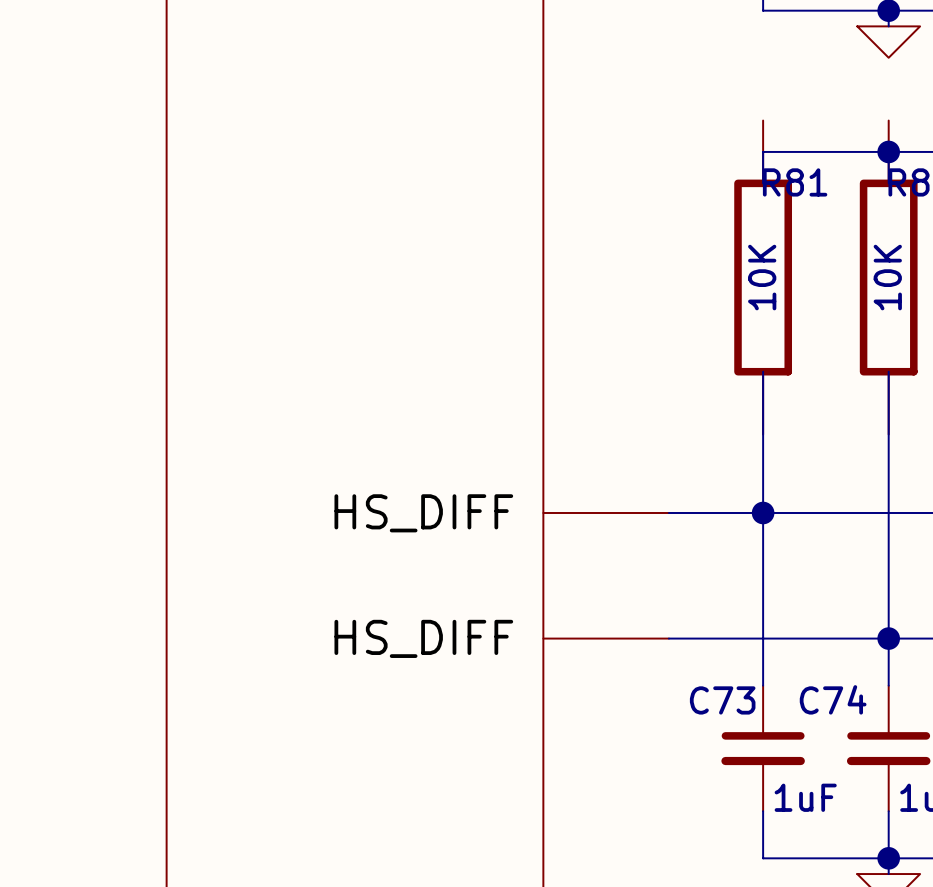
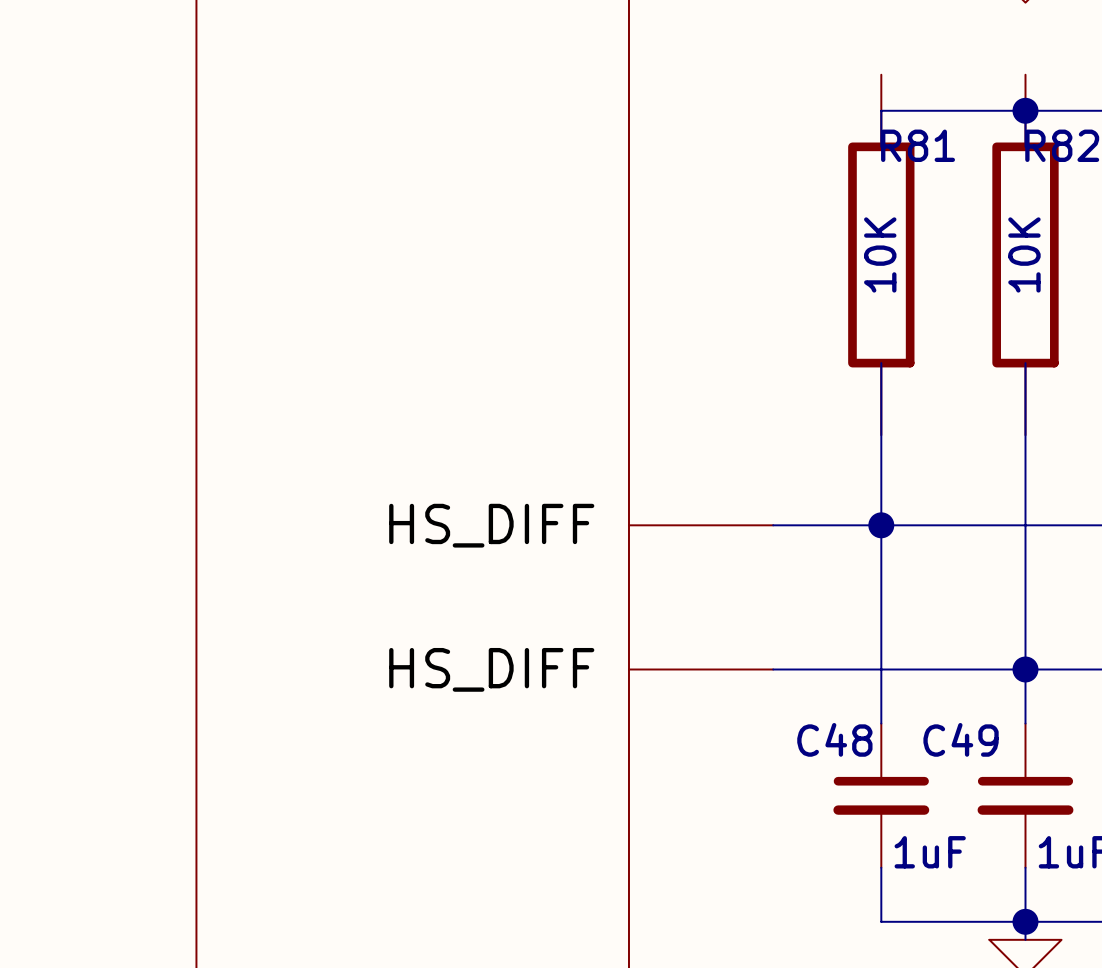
C74 name: C74 (833, 699) -> C49 (961, 739)
C73 name: C73 (722, 700) -> C48 (834, 739)

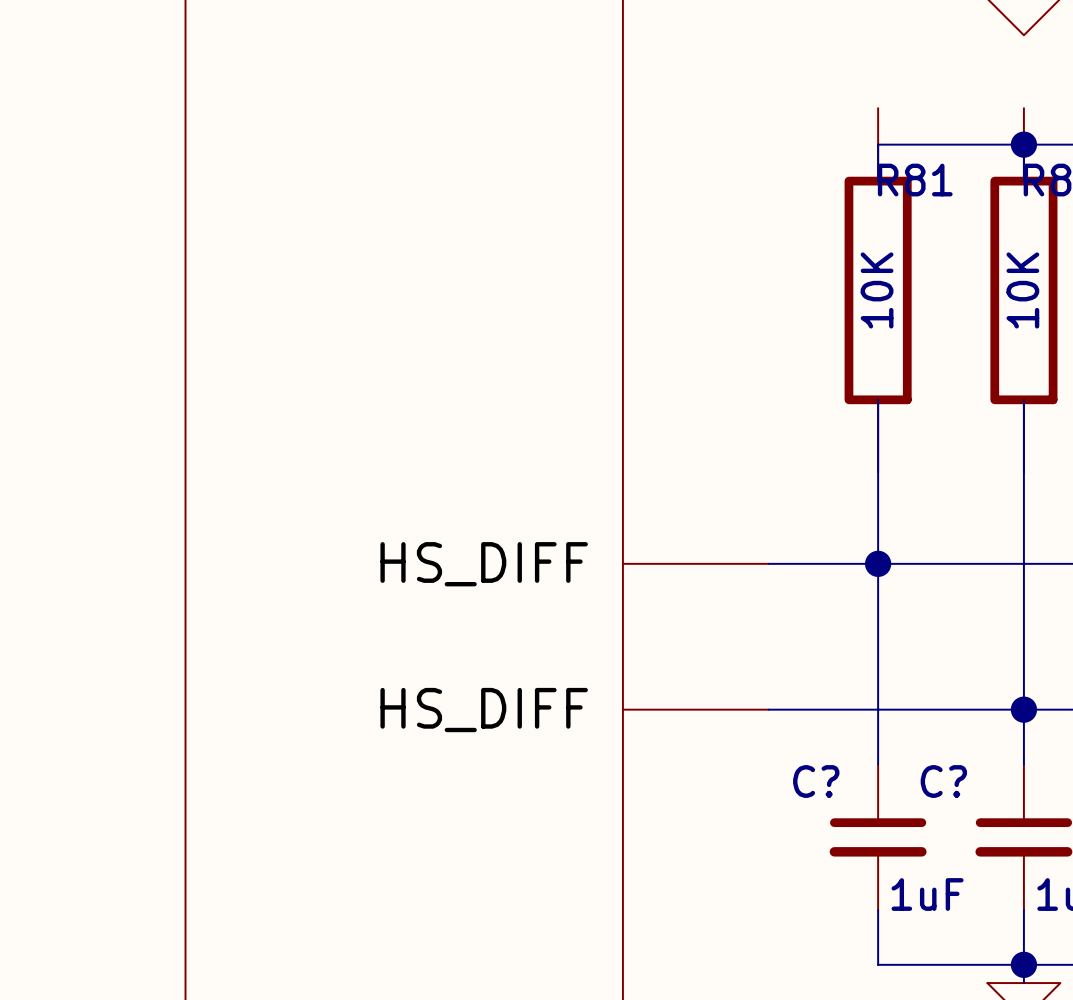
C48 name: C48 (834, 739) -> C? (816, 781)
C49 name: C49 (961, 739) -> C? (943, 781)

